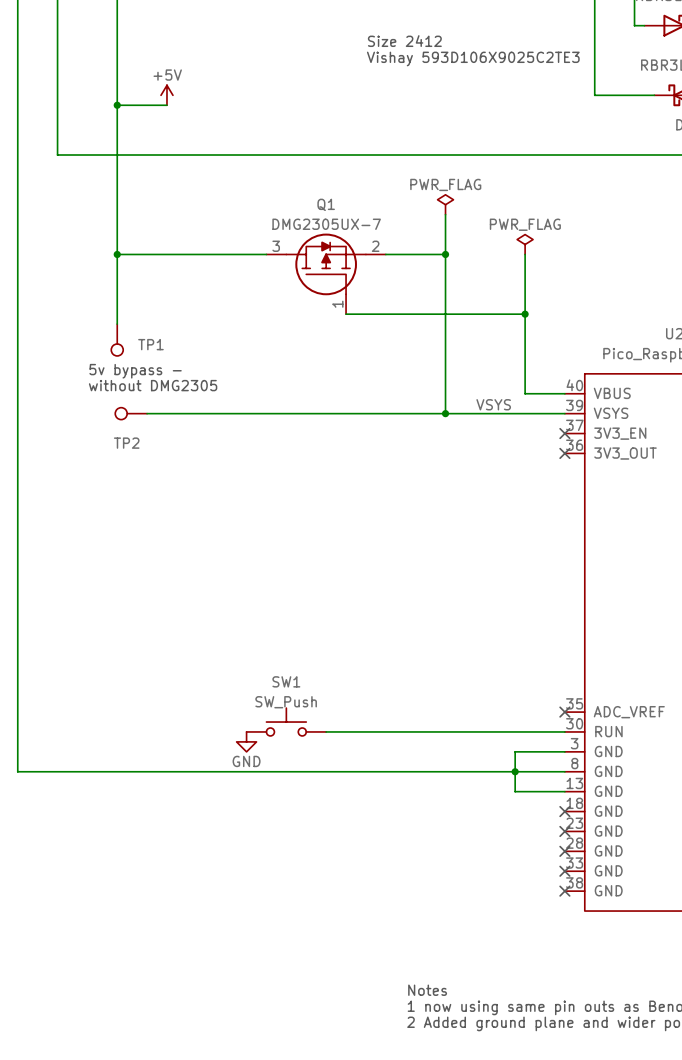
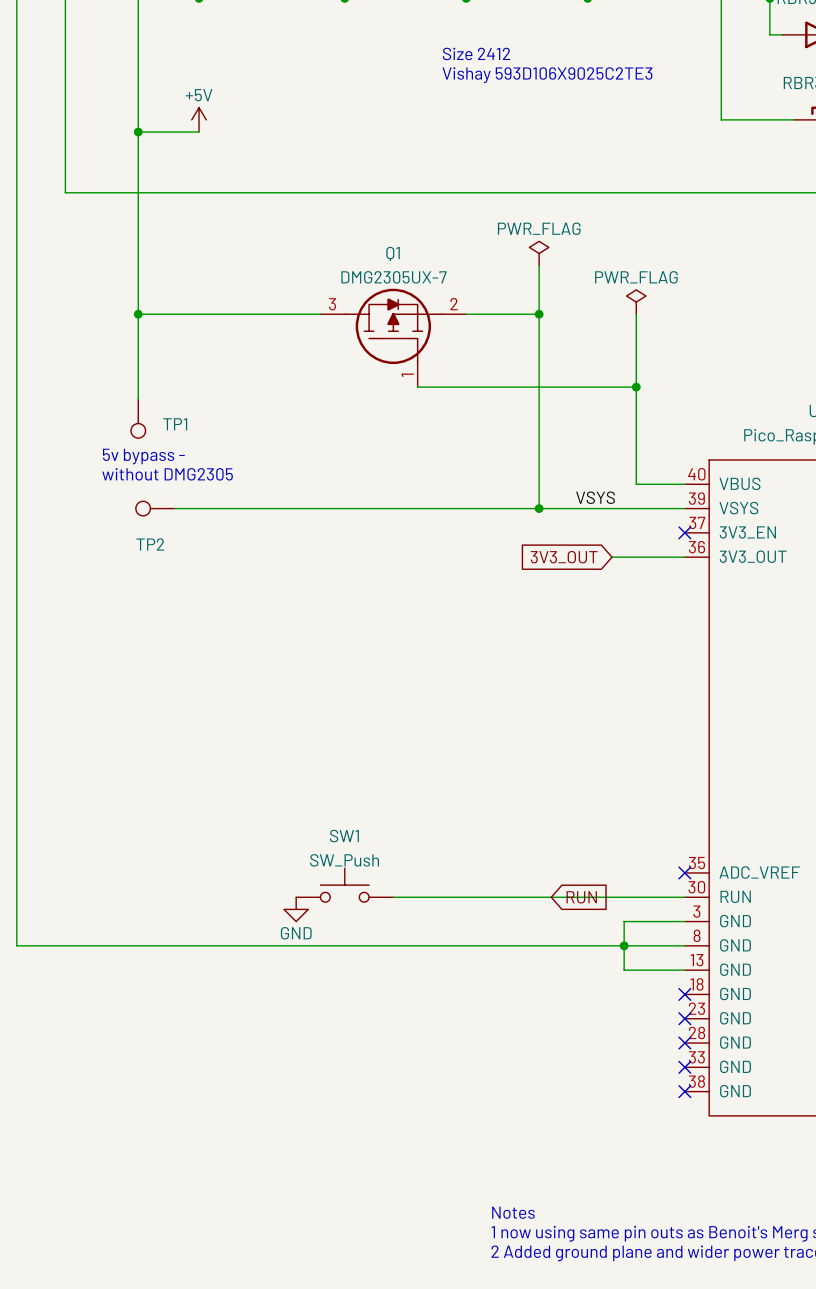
global label: none -> 3V3_OUT (564, 557)
wire: none -> (611, 557) (684, 557)
no-connect mark: (564, 453) -> none
global label: none -> RUN (581, 897)

